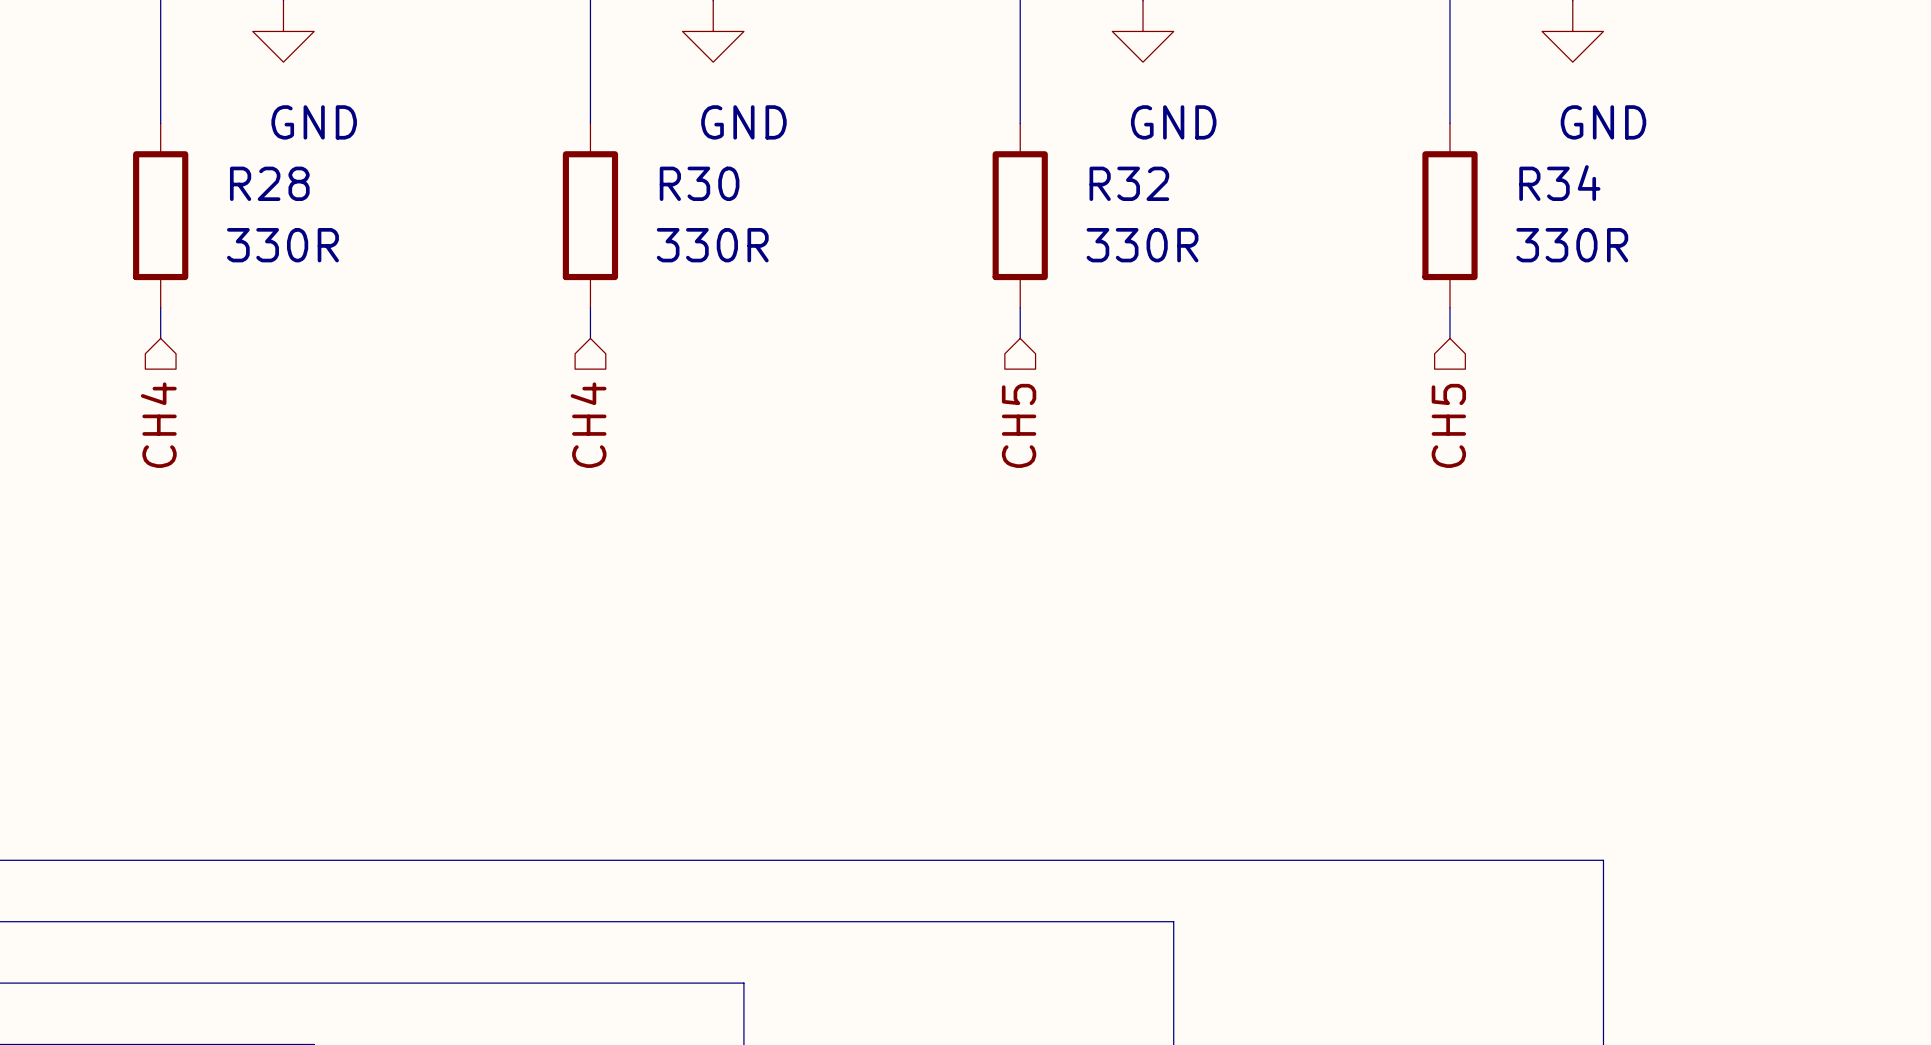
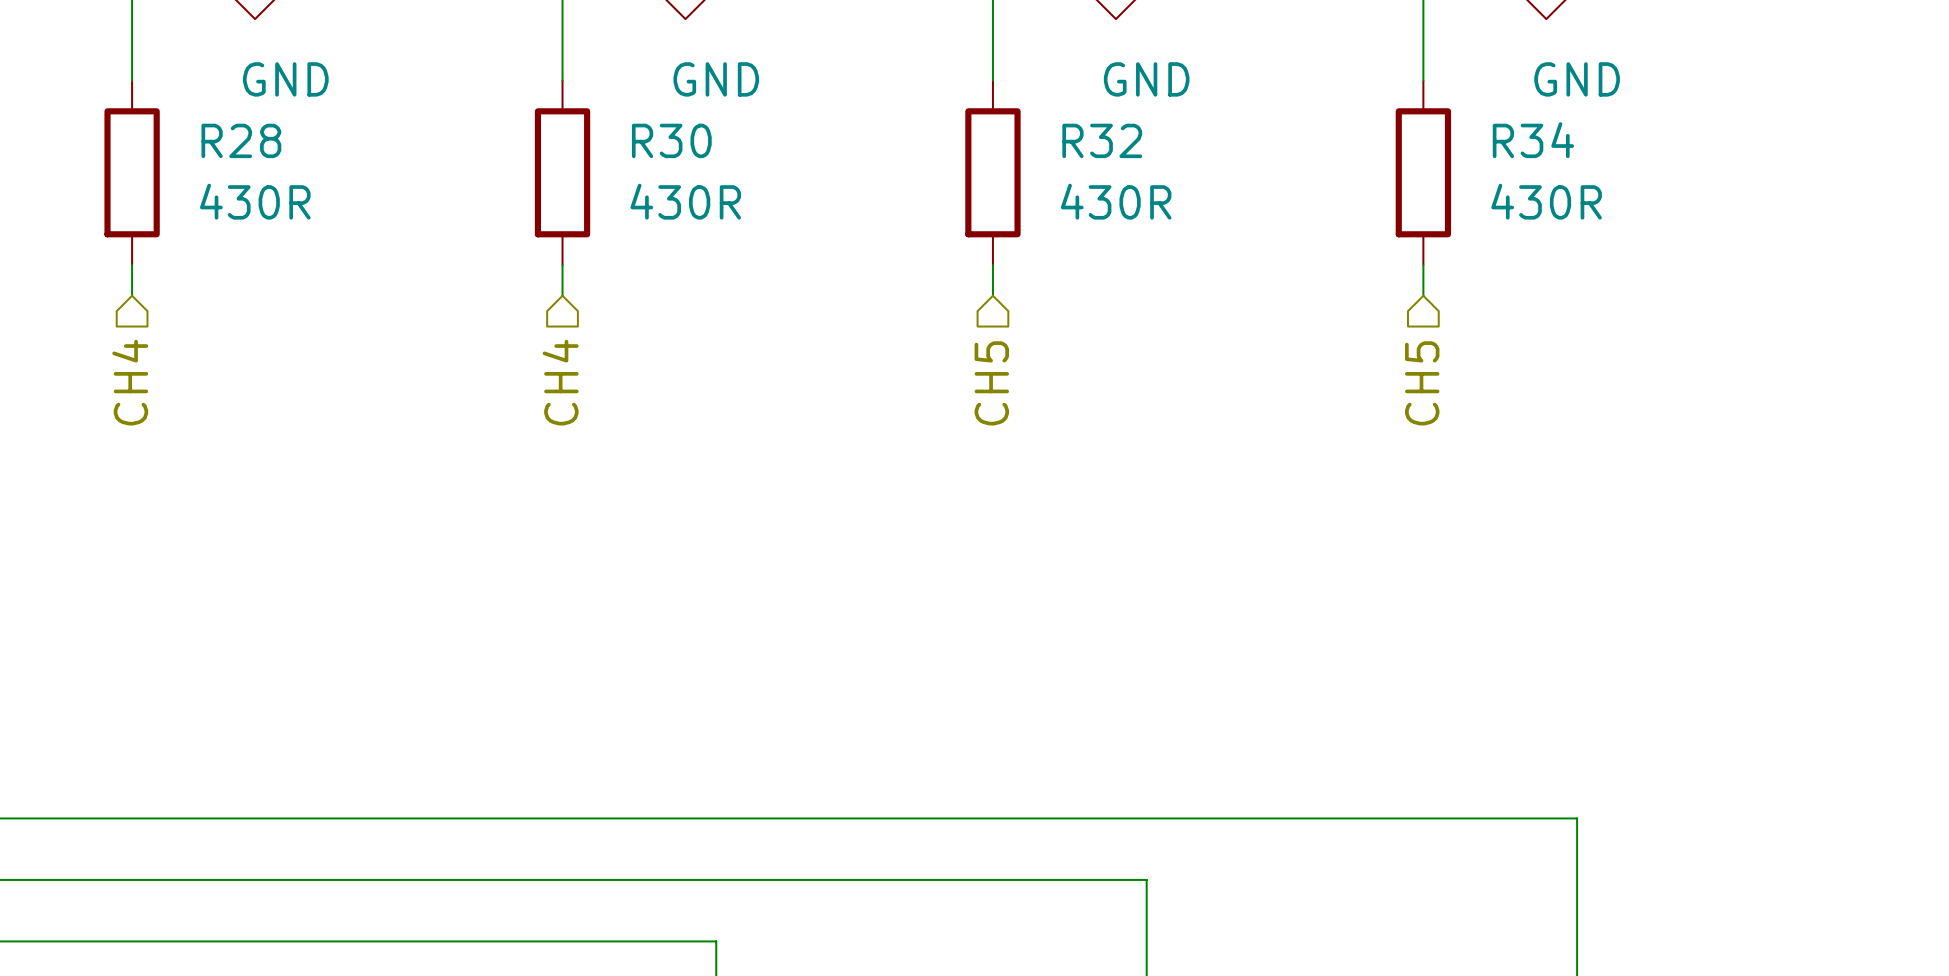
R28 value: 330R (282, 245) -> 430R (255, 201)
R30 value: 330R (712, 245) -> 430R (685, 201)
R32 value: 330R (1142, 245) -> 430R (1116, 201)
R34 value: 330R (1572, 245) -> 430R (1546, 201)

